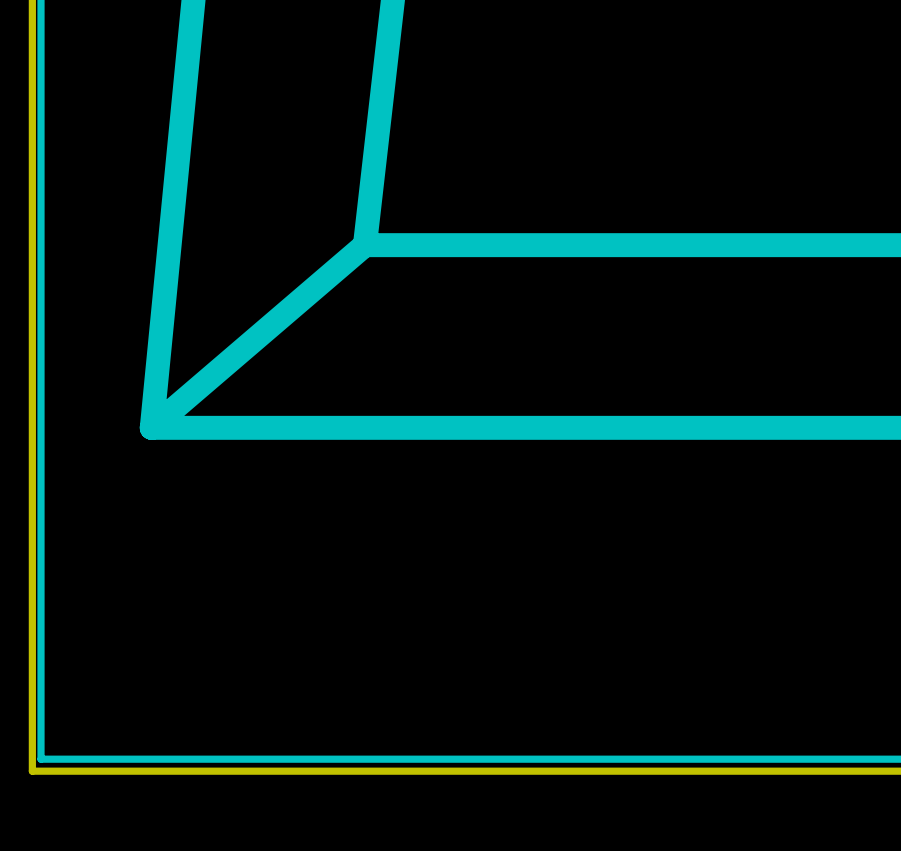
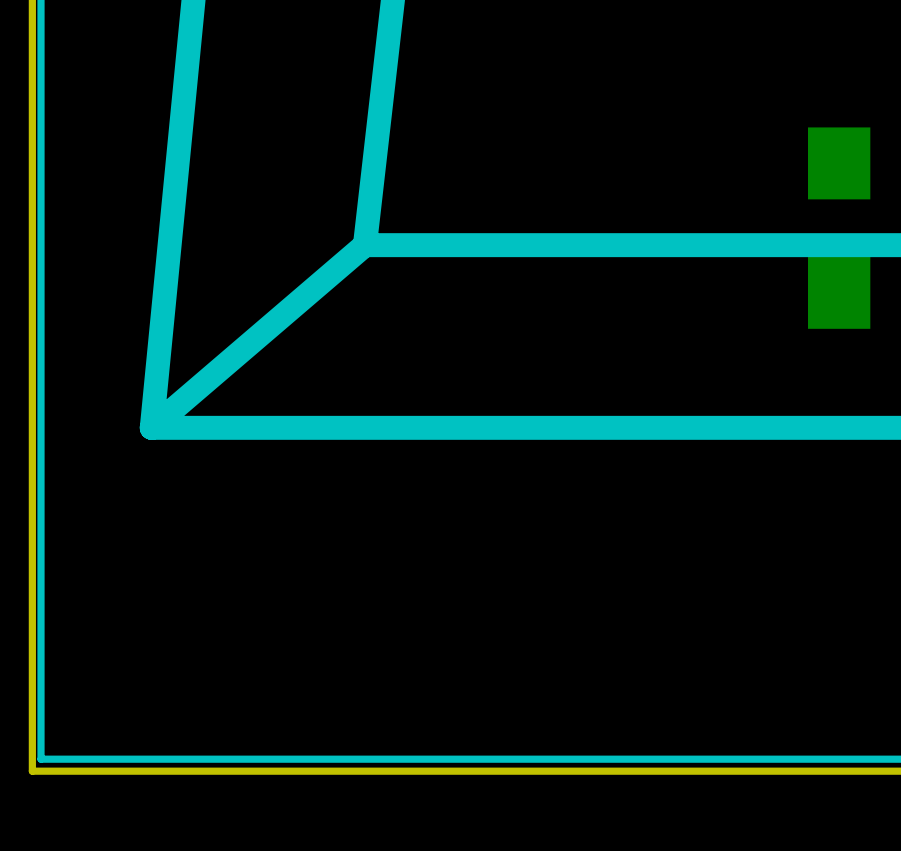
part: none -> (839, 228)

